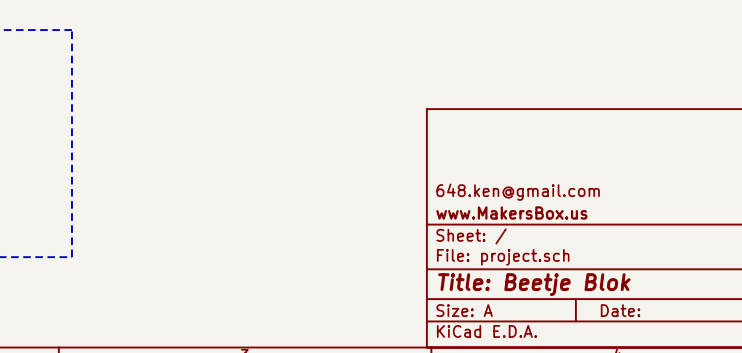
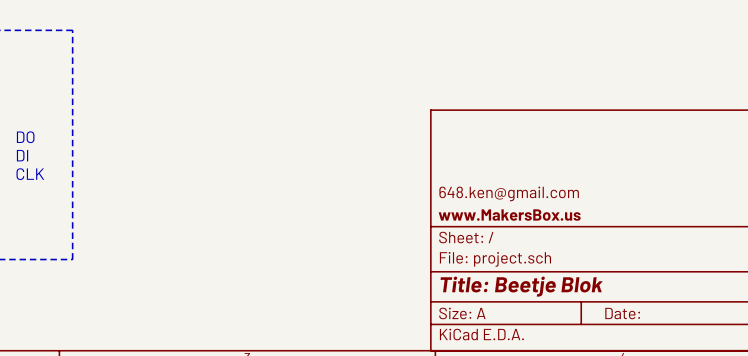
text: none -> DO (25, 137)
text: none -> DI (22, 155)
text: none -> CLK (30, 174)

